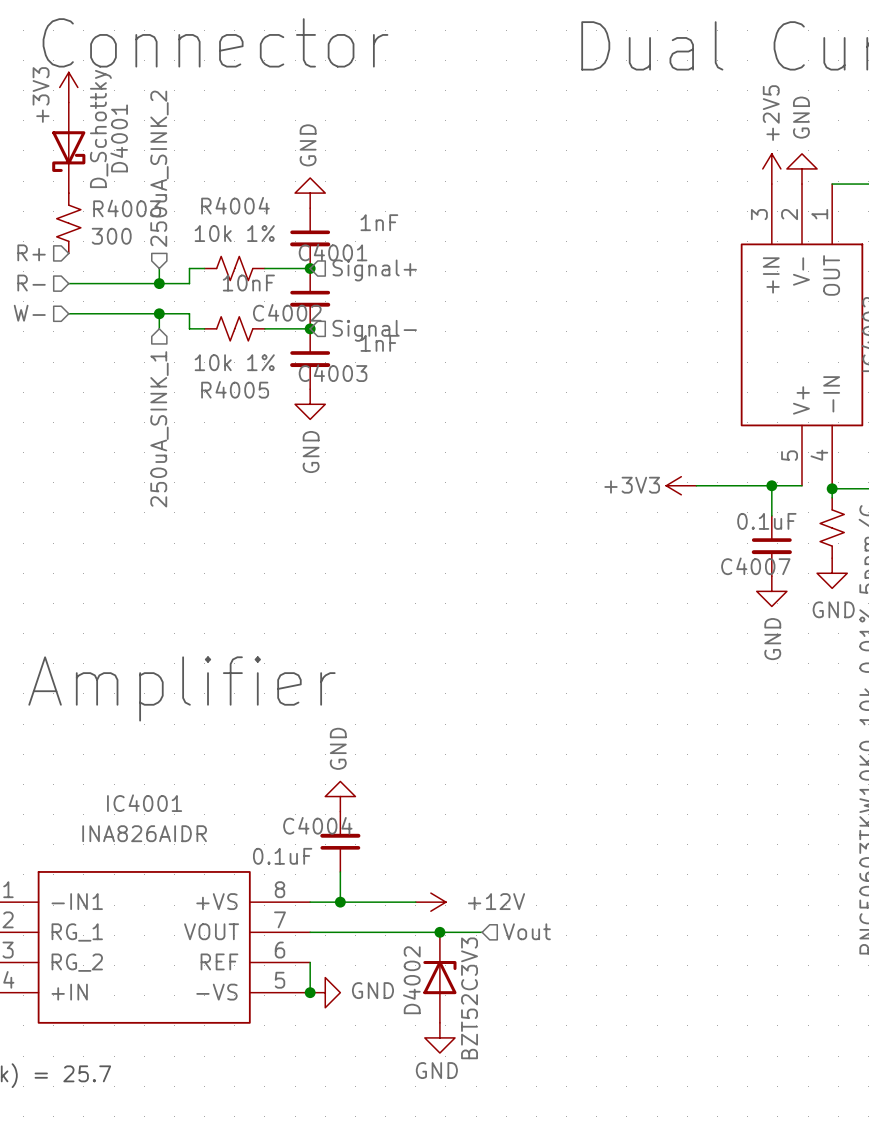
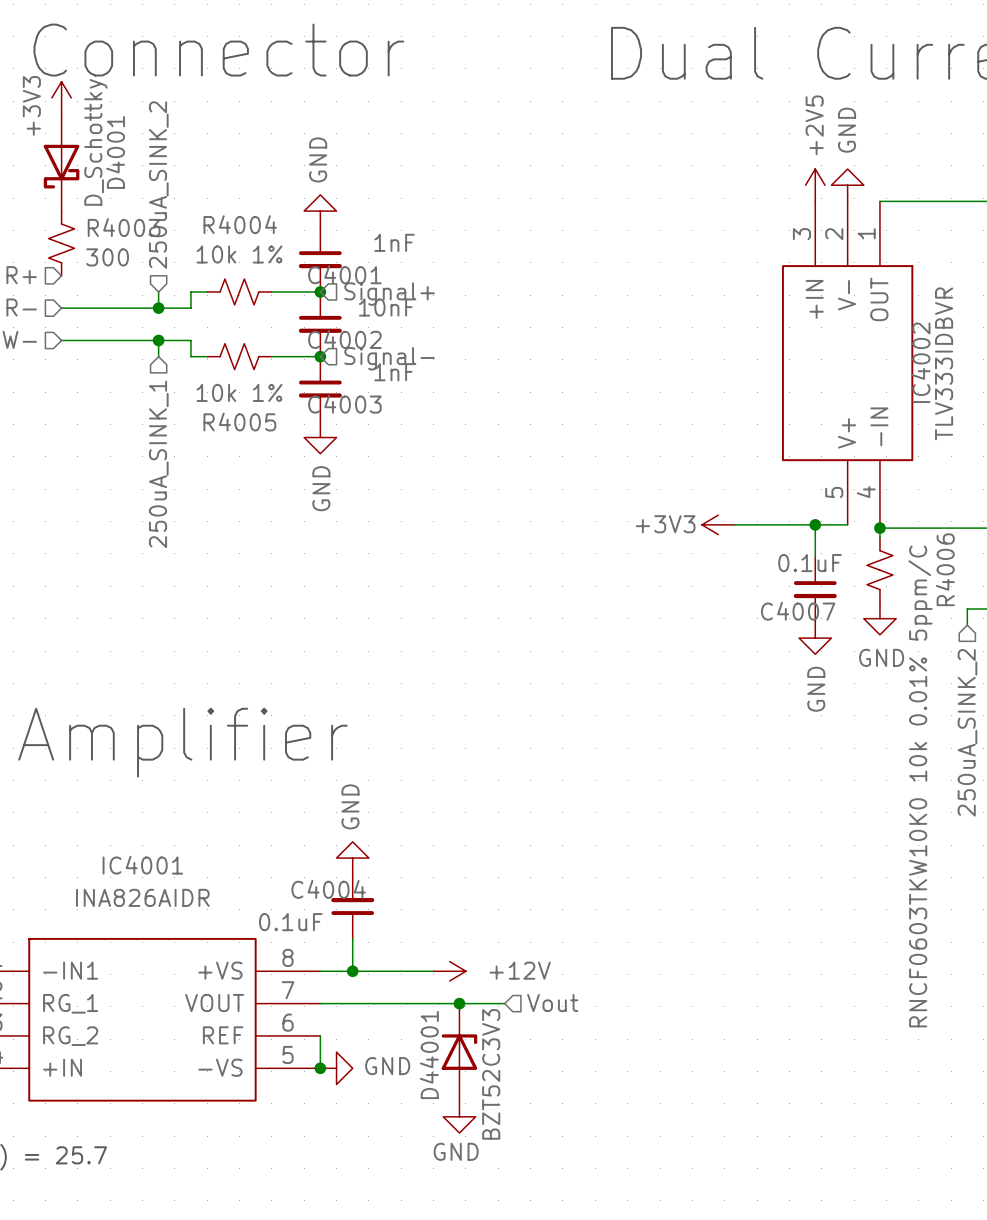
C4002 value position: 10nF (248, 283) -> 10nF (386, 307)
C4002 name position: C4002 (287, 312) -> C4002 (344, 339)
D4002 name: D4002 (411, 980) -> D44001 (429, 1054)

